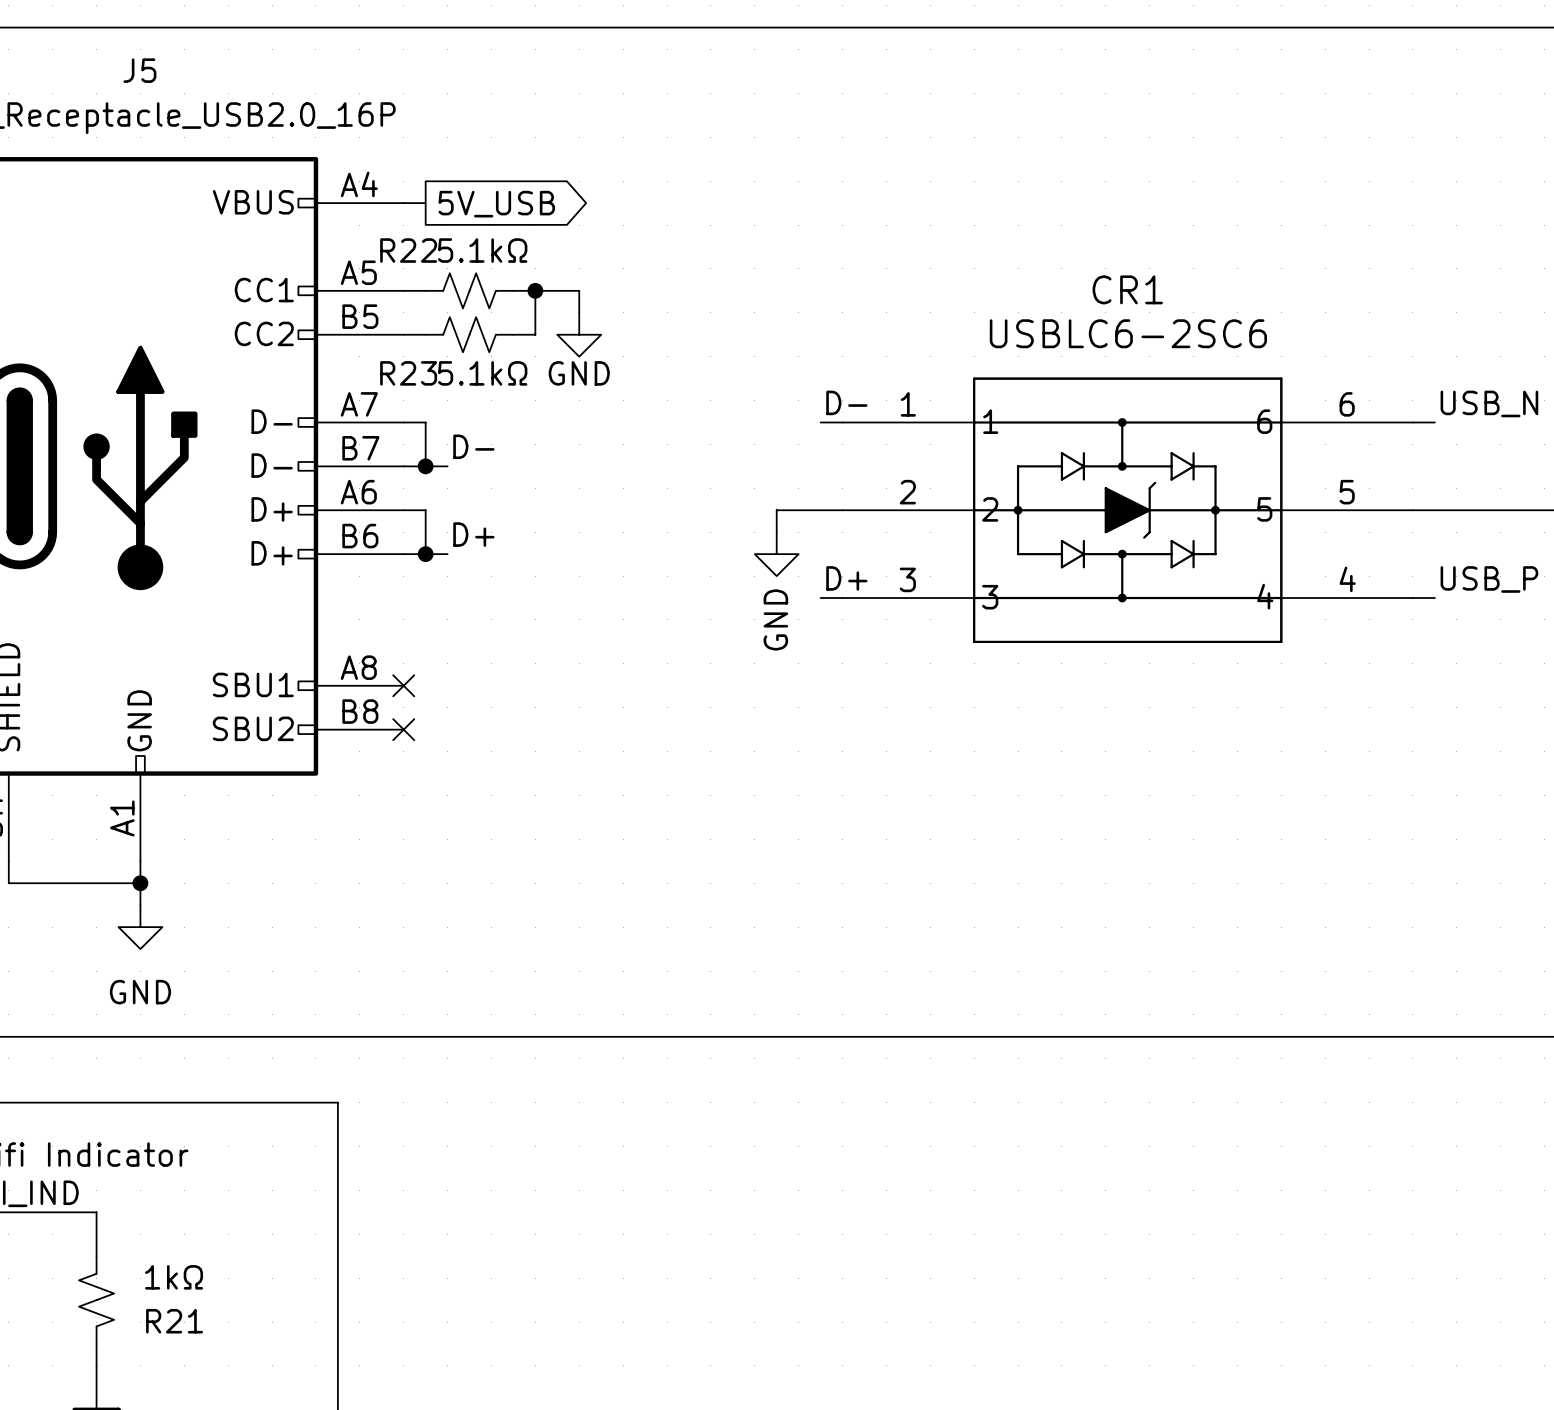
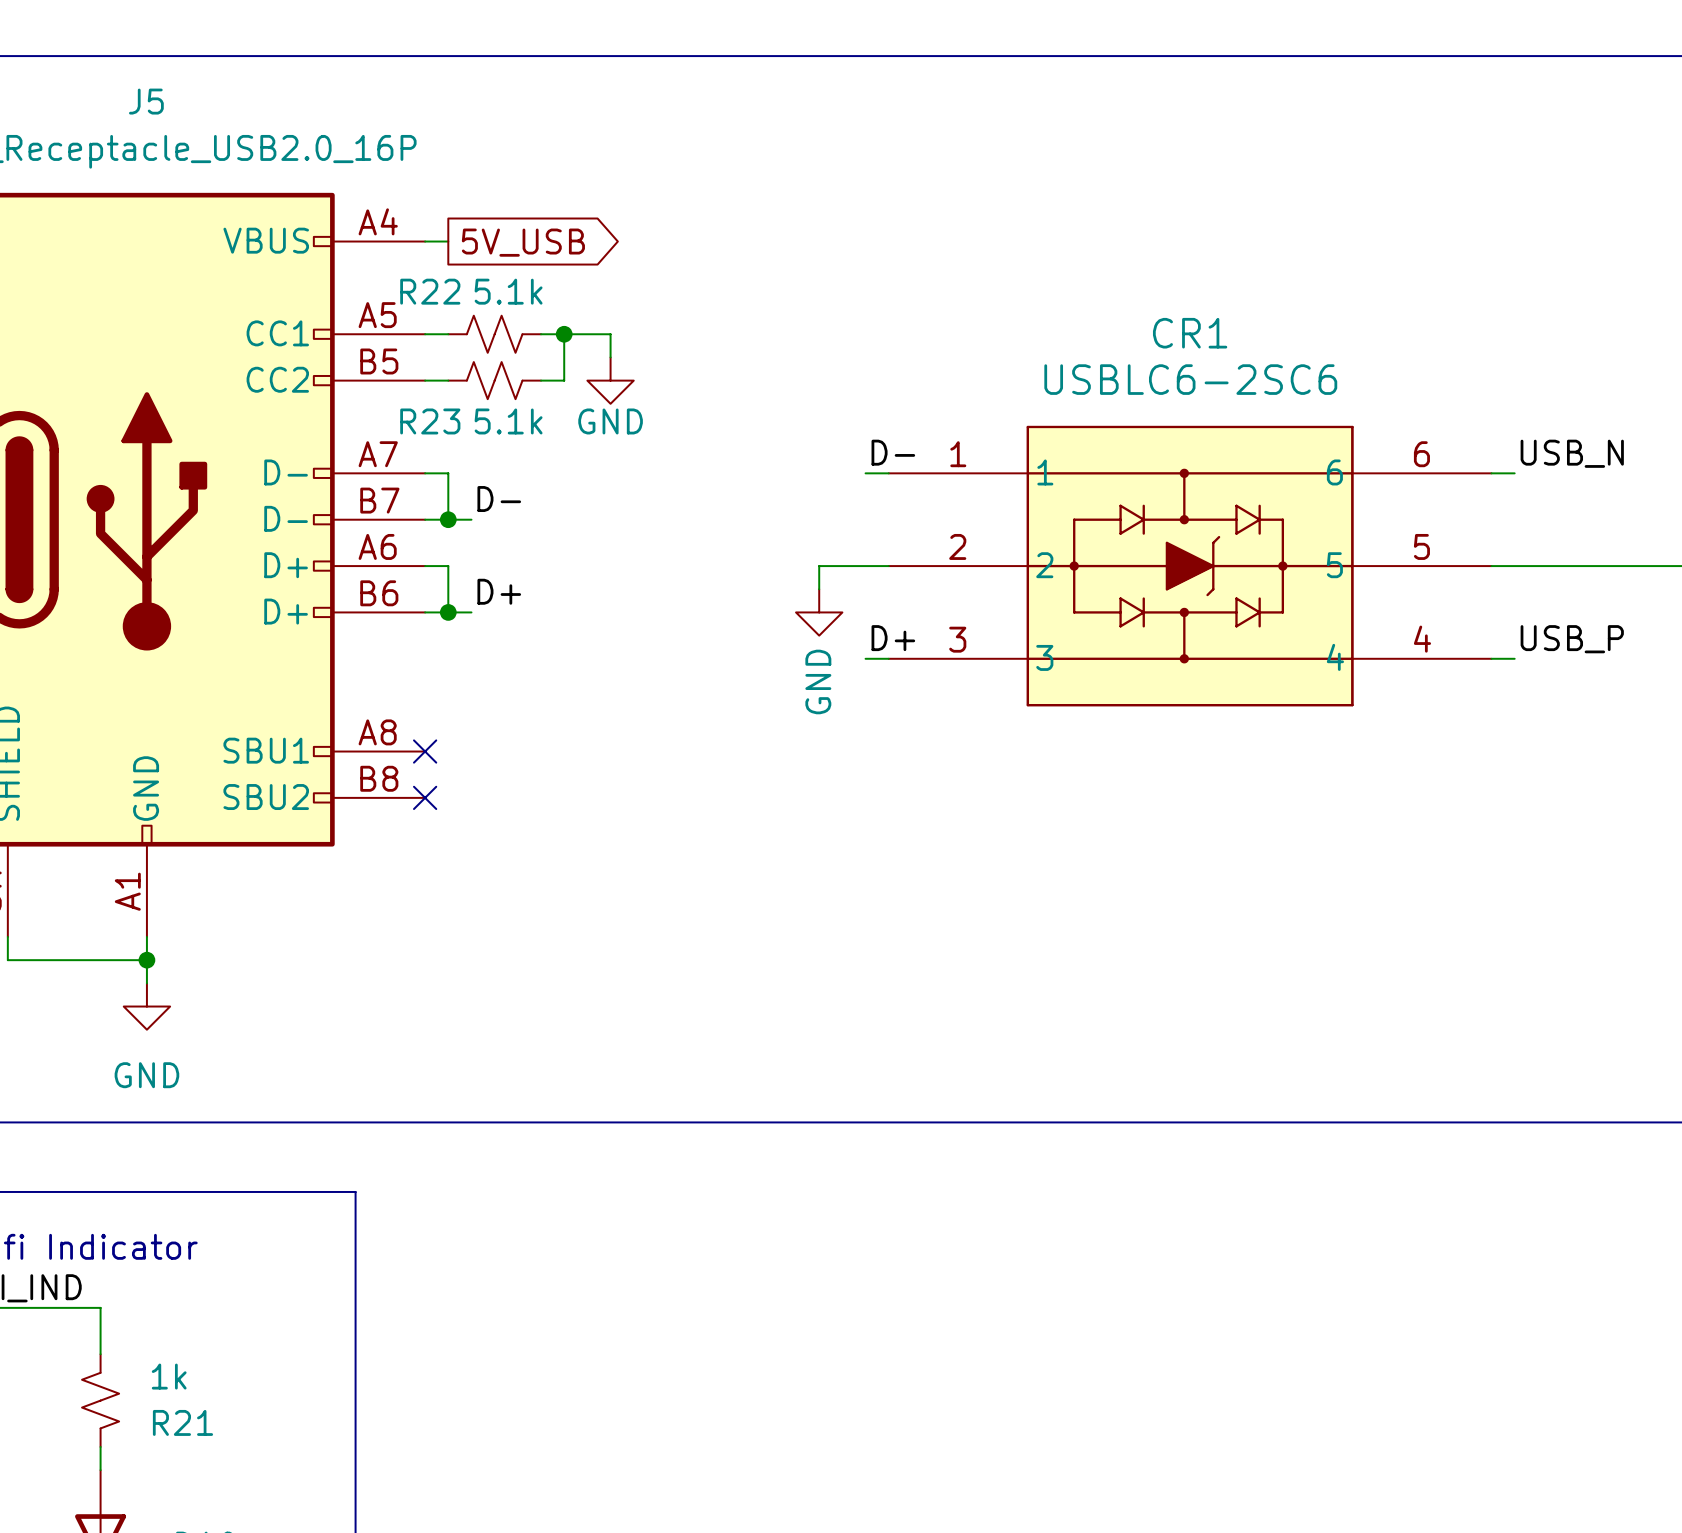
R22 value: 5.1kΩ (482, 250) -> 5.1k (508, 291)
R23 value: 5.1kΩ (482, 373) -> 5.1k (508, 421)
R21 value: 1kΩ (174, 1277) -> 1k (169, 1376)

